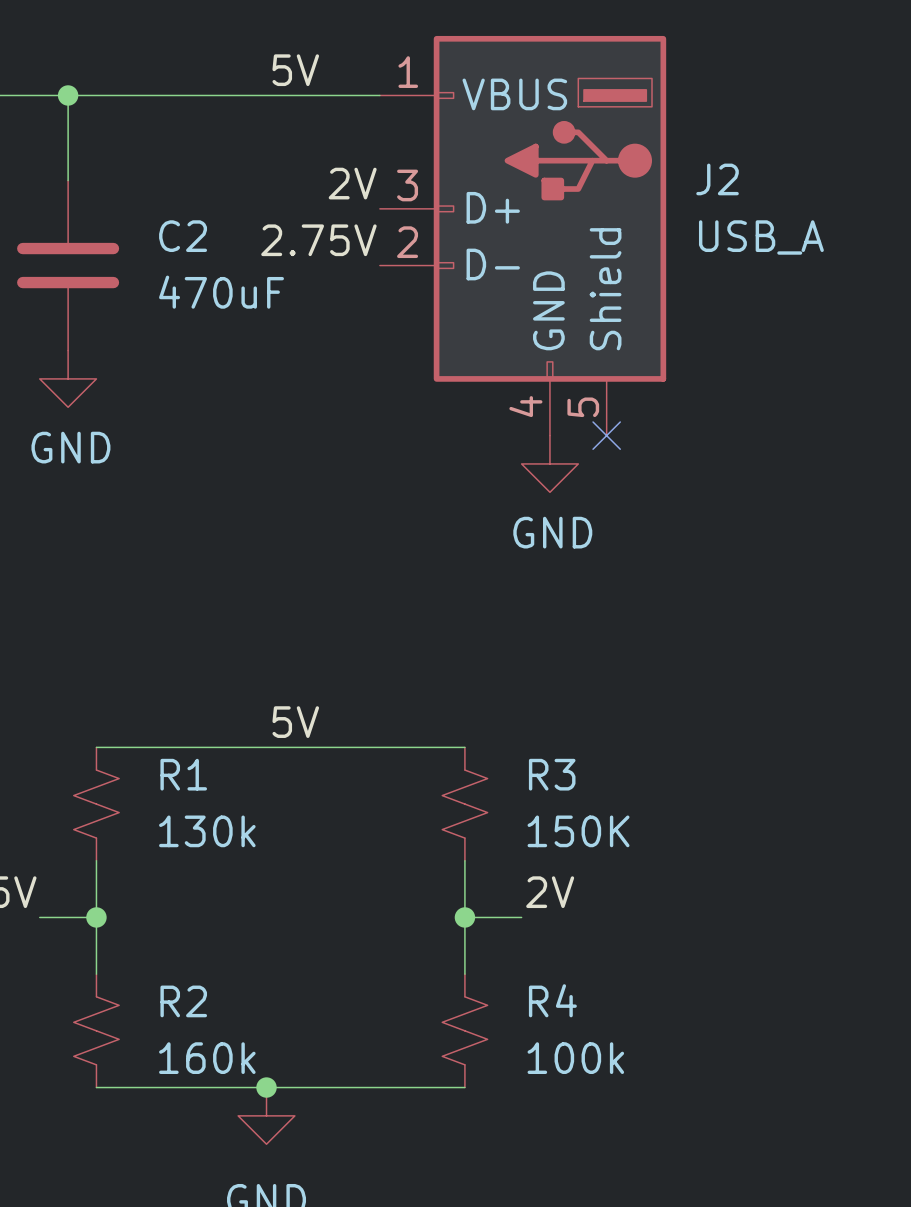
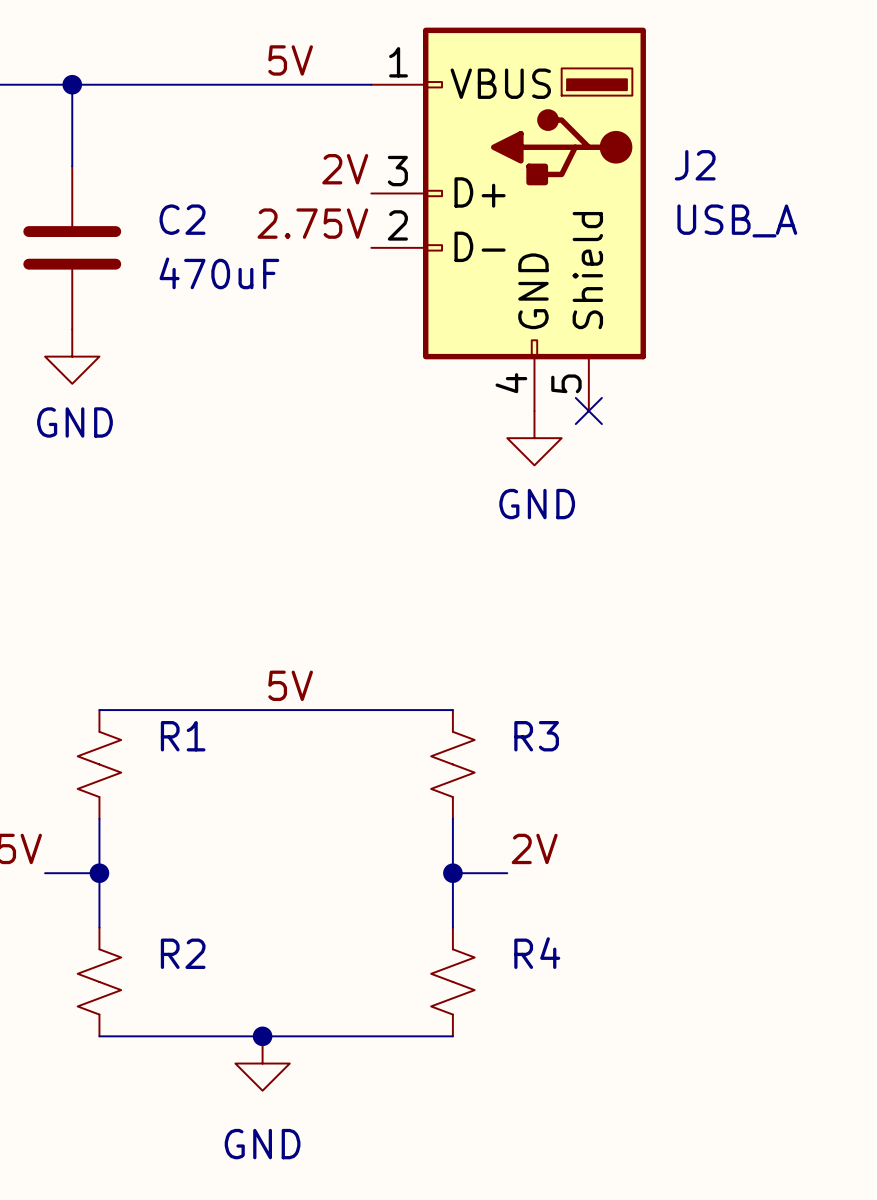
R1 value: 130k (207, 831) -> none
R3 value: 150K (578, 831) -> none
R2 value: 160k (207, 1058) -> none
R4 value: 100k (575, 1058) -> none

